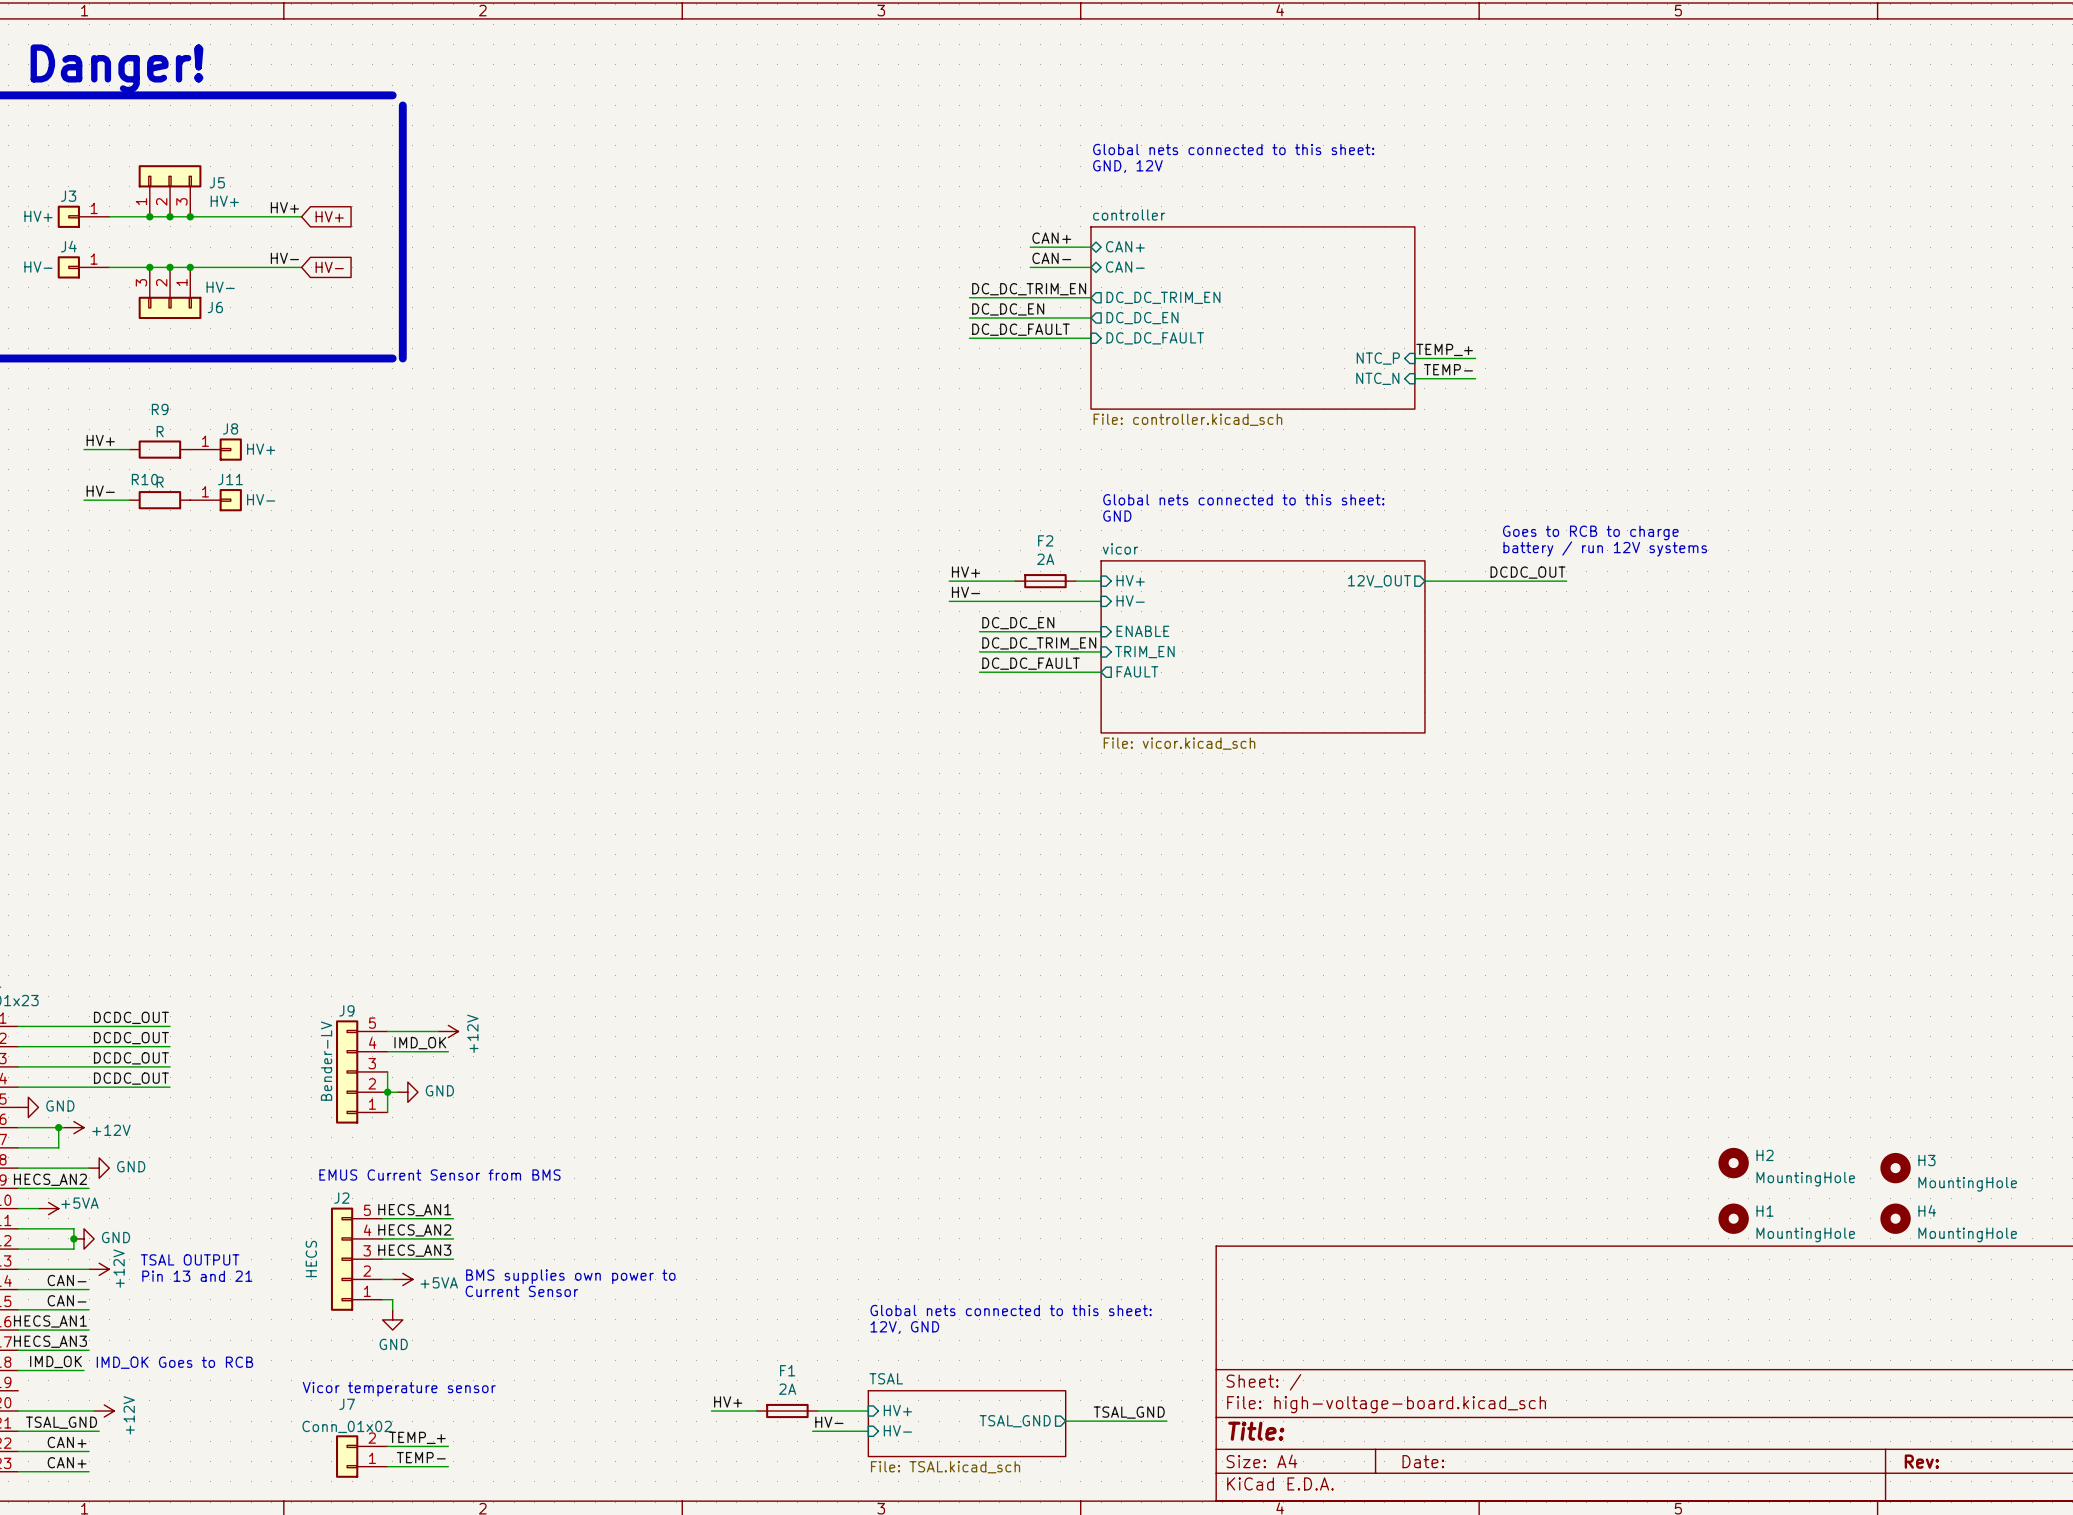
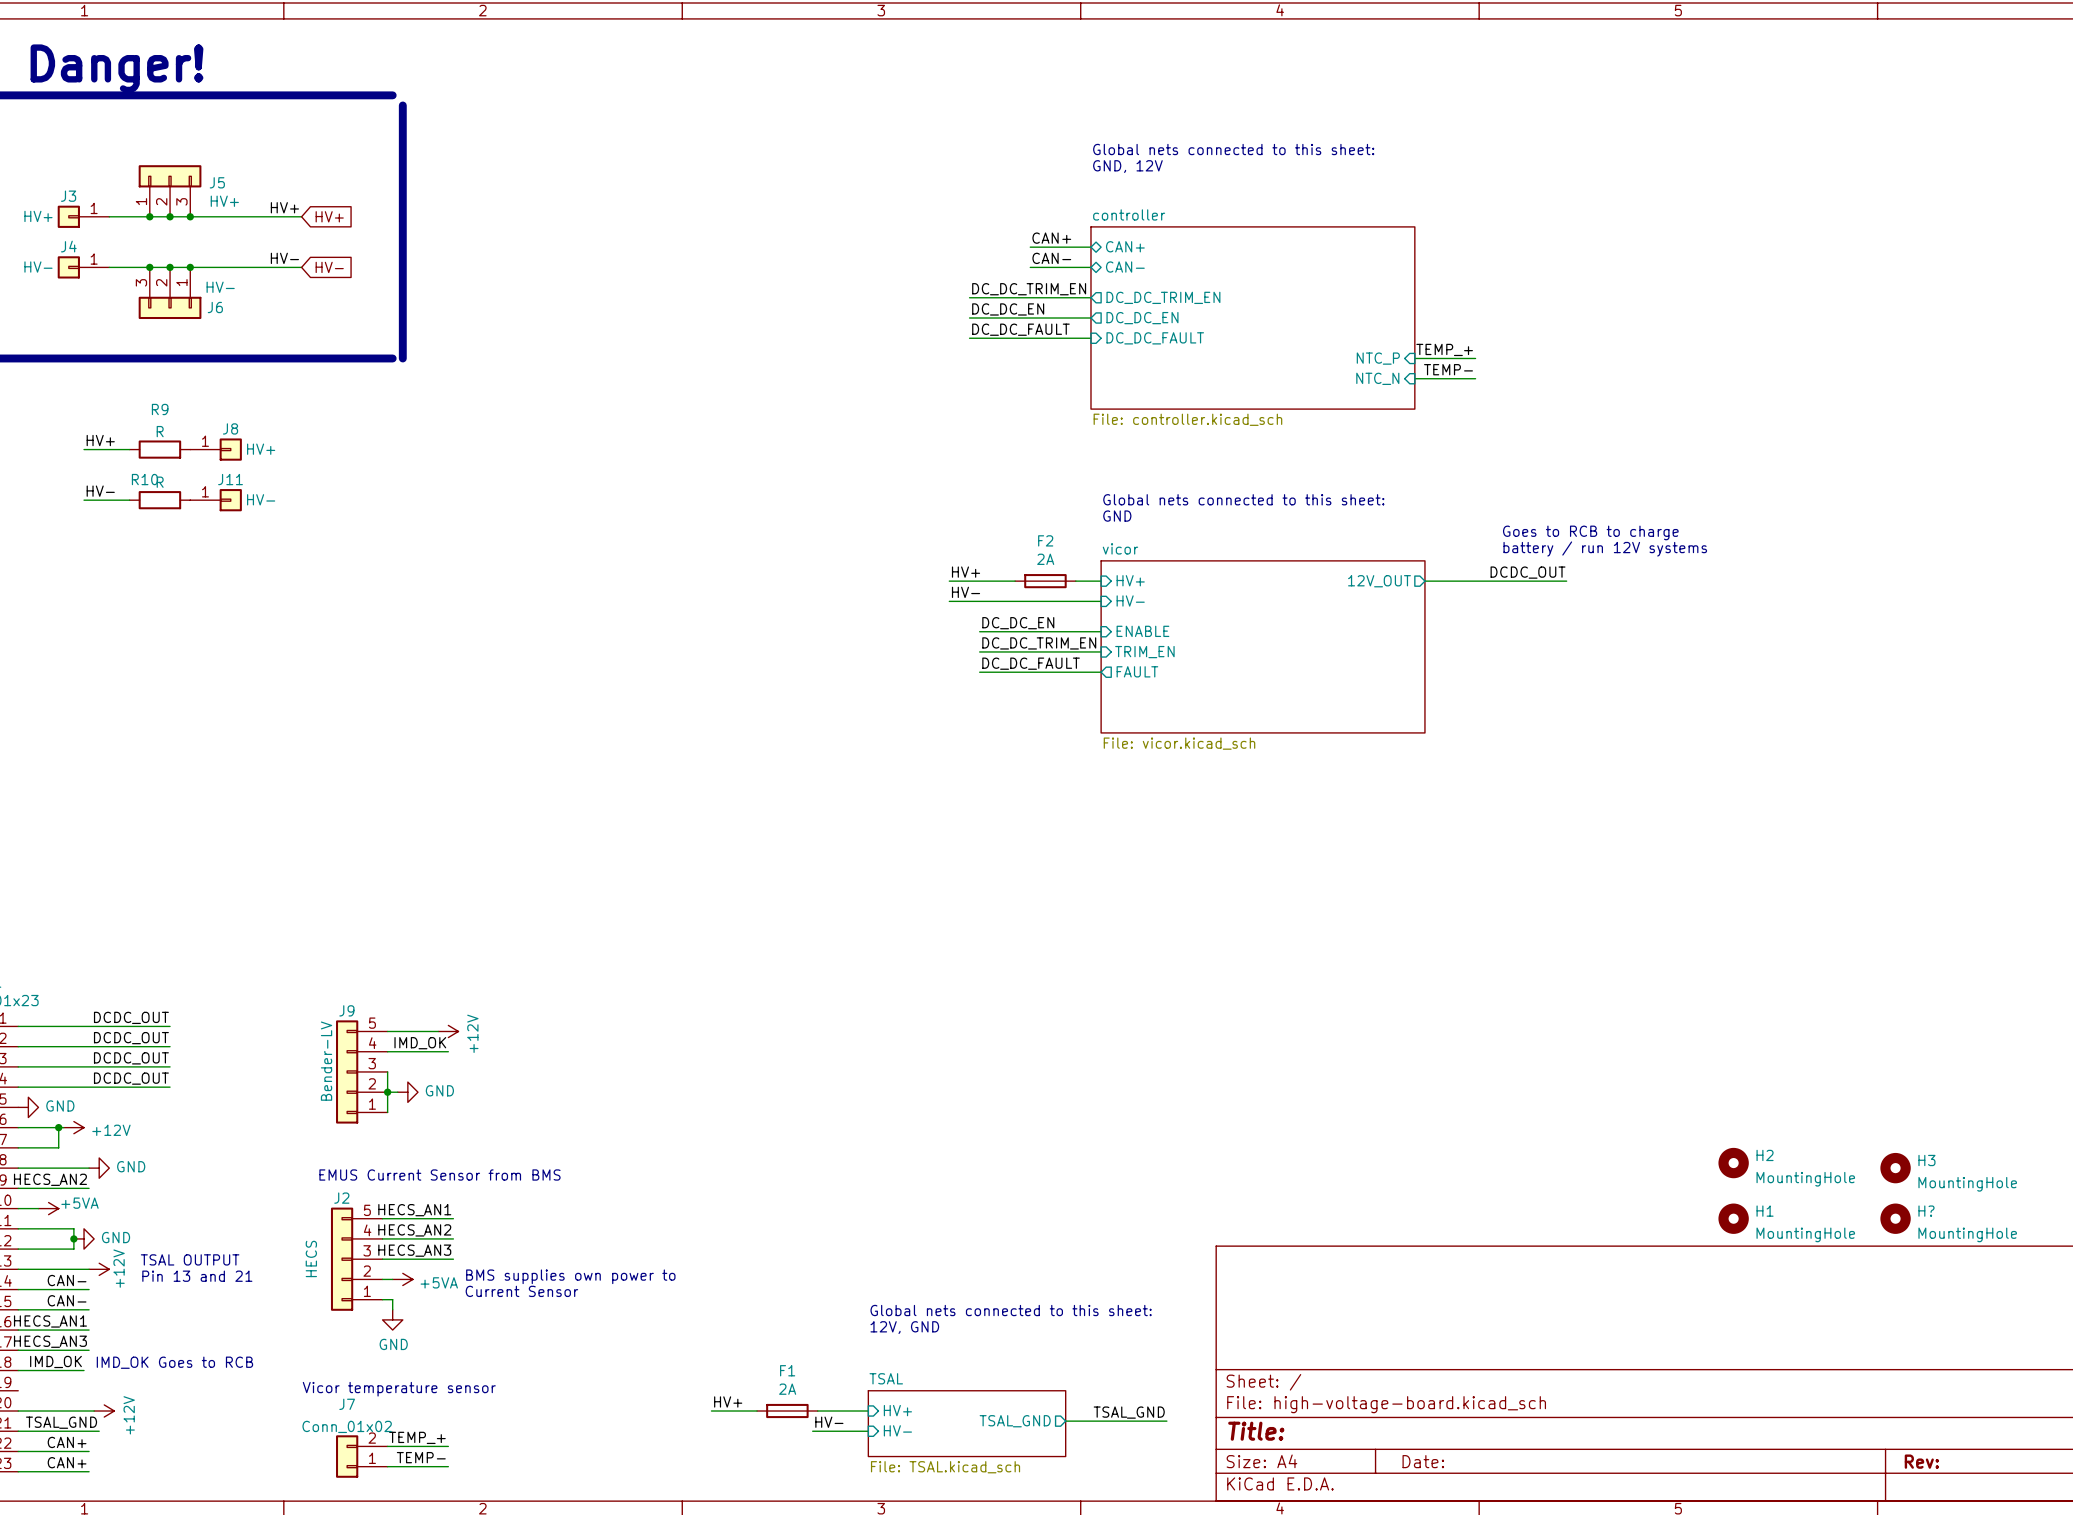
H4 name: H4 (1927, 1210) -> H? (1926, 1211)

